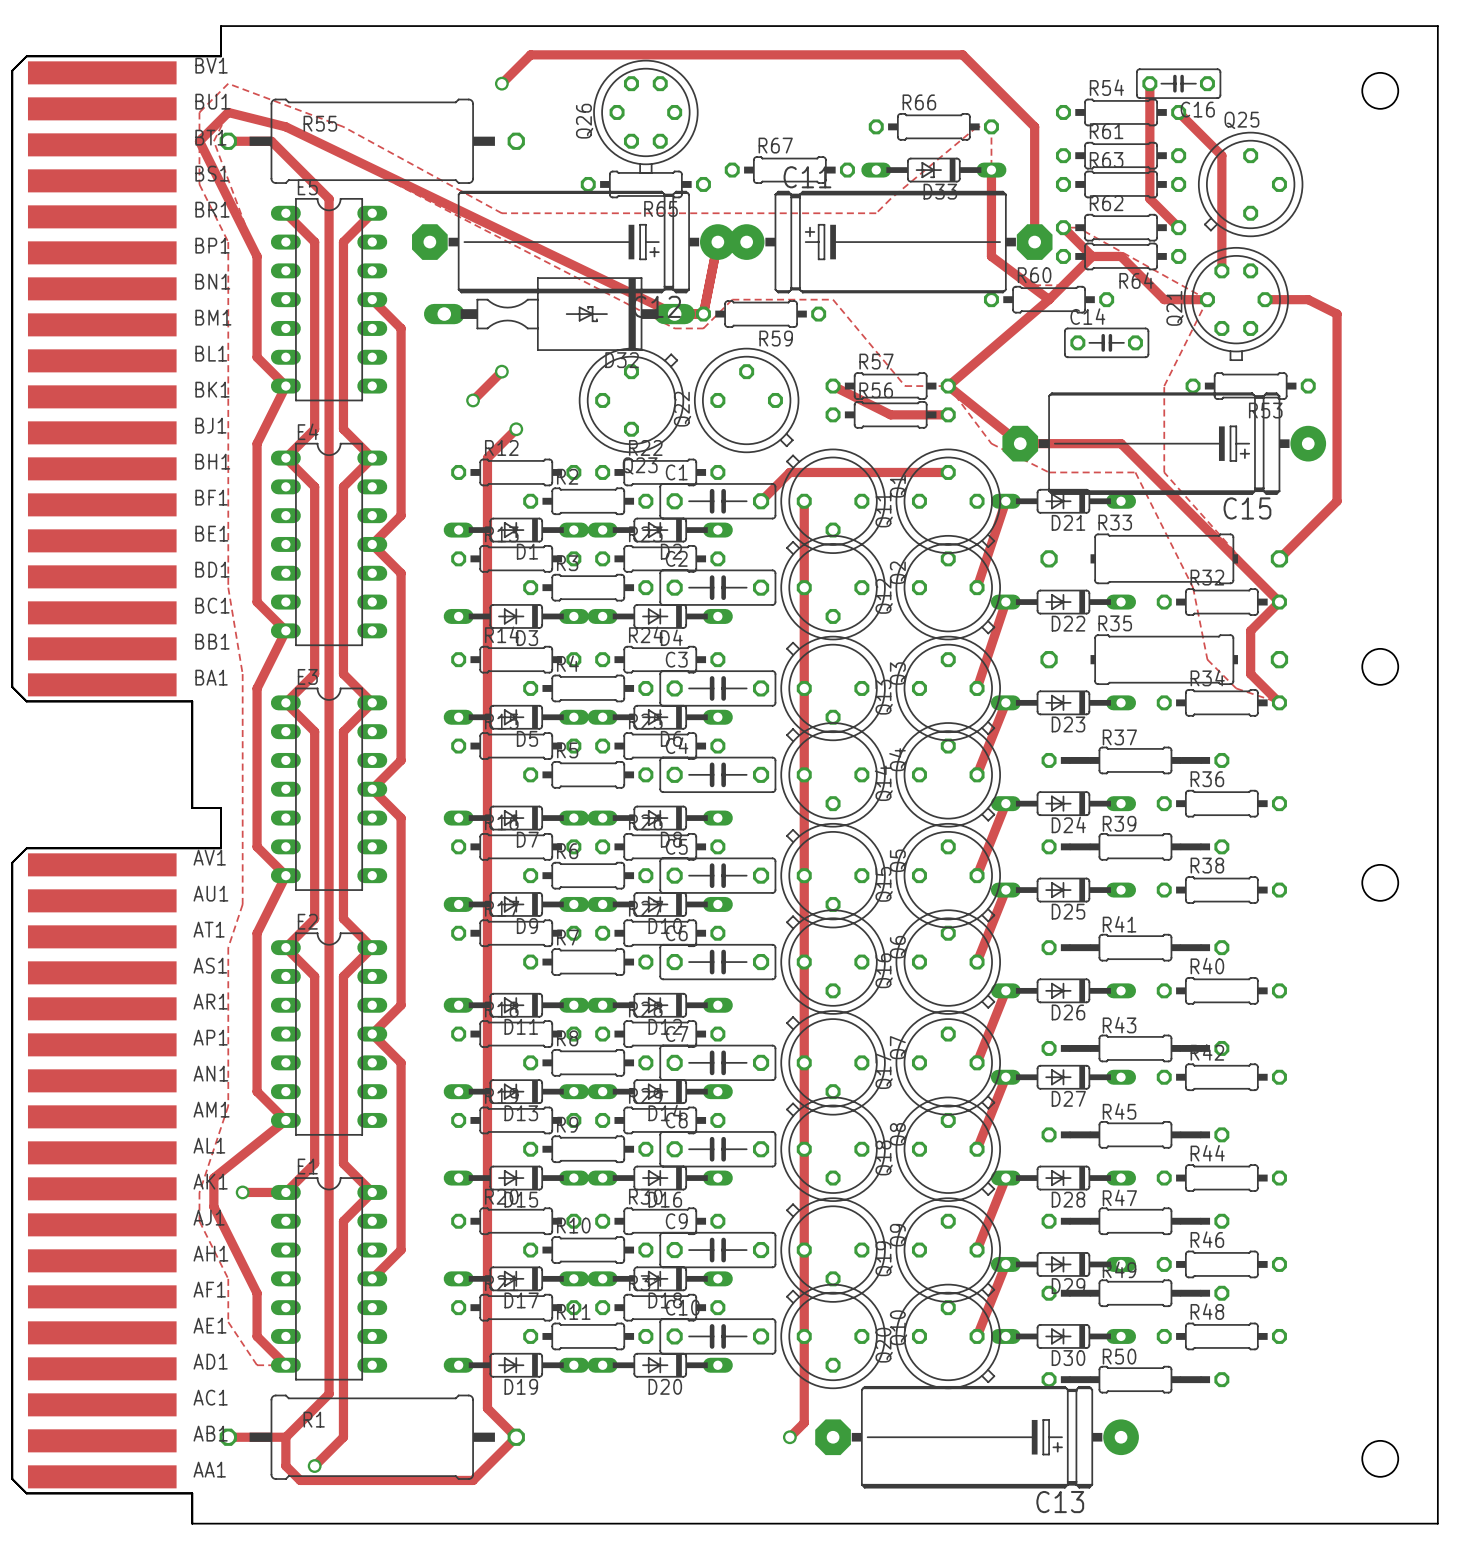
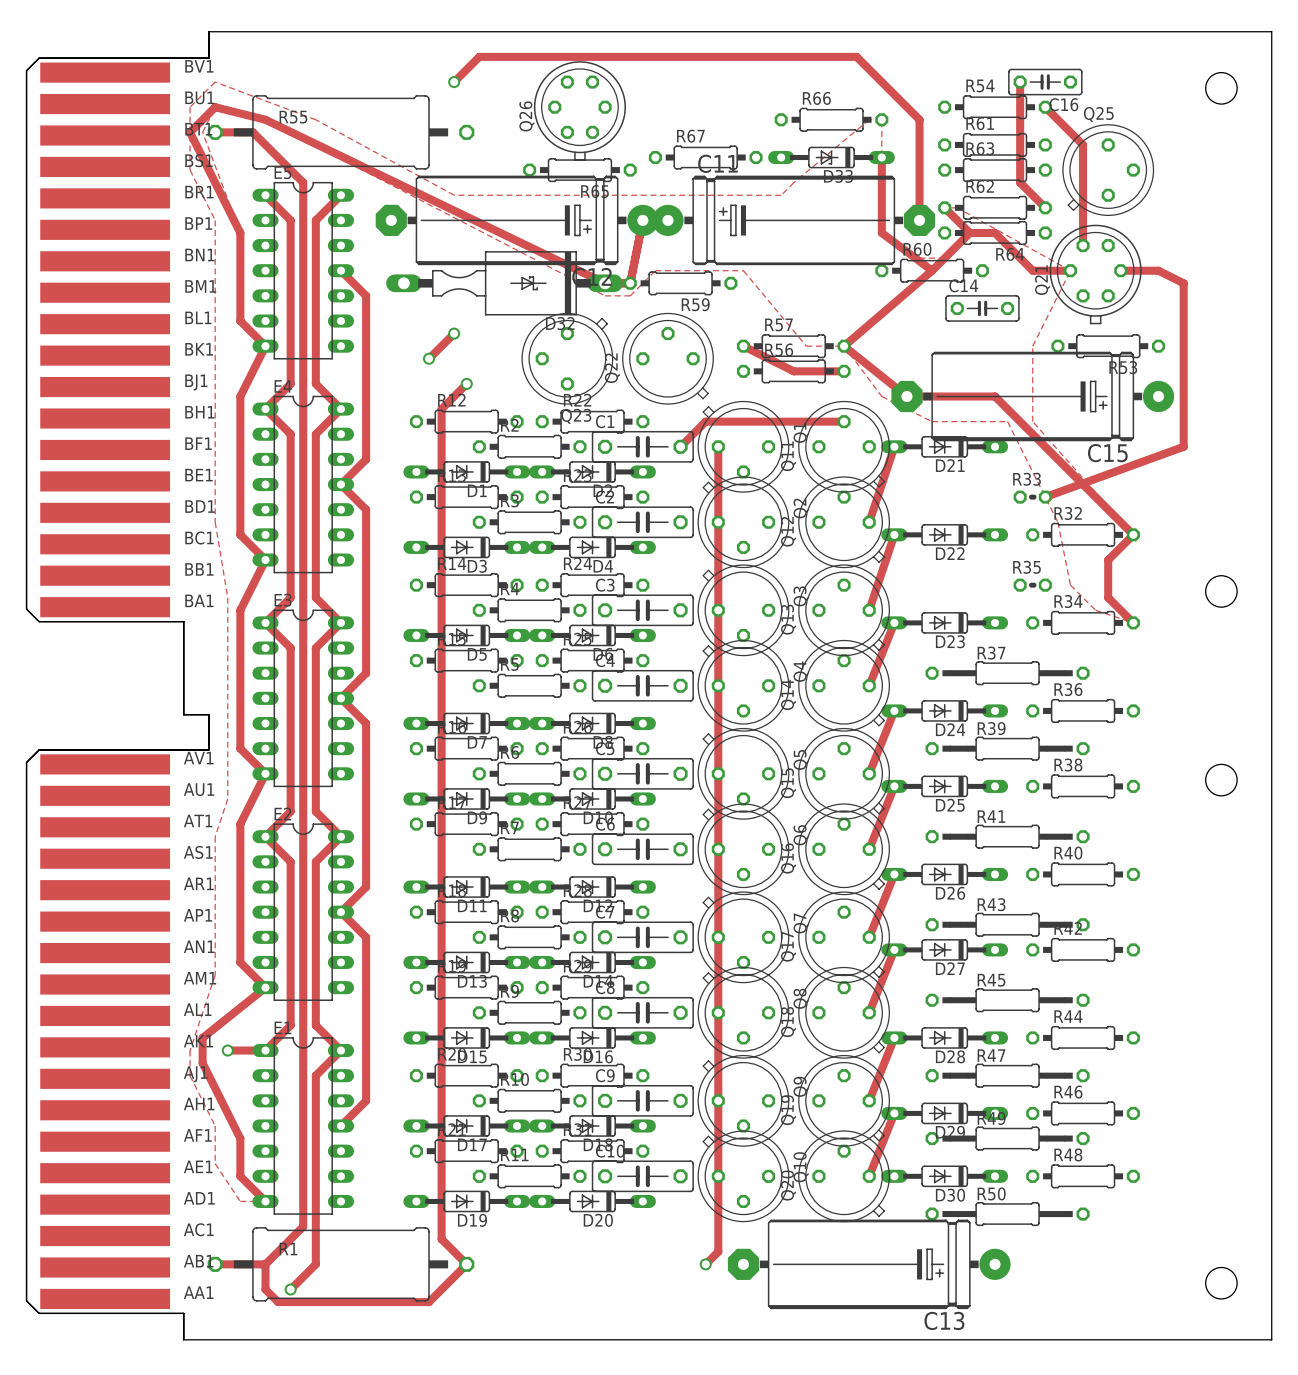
track: (1337, 501) (1279, 558) -> (1183, 446) (1045, 497)
R33 name position: R33 (1115, 522) -> R33 (1027, 479)
R33 footprint: [1040, 533, 1289, 585] -> [1013, 490, 1052, 504]
R35 name position: R35 (1115, 623) -> R35 (1026, 567)
R35 footprint: [1040, 634, 1289, 686] -> [1013, 578, 1052, 592]

